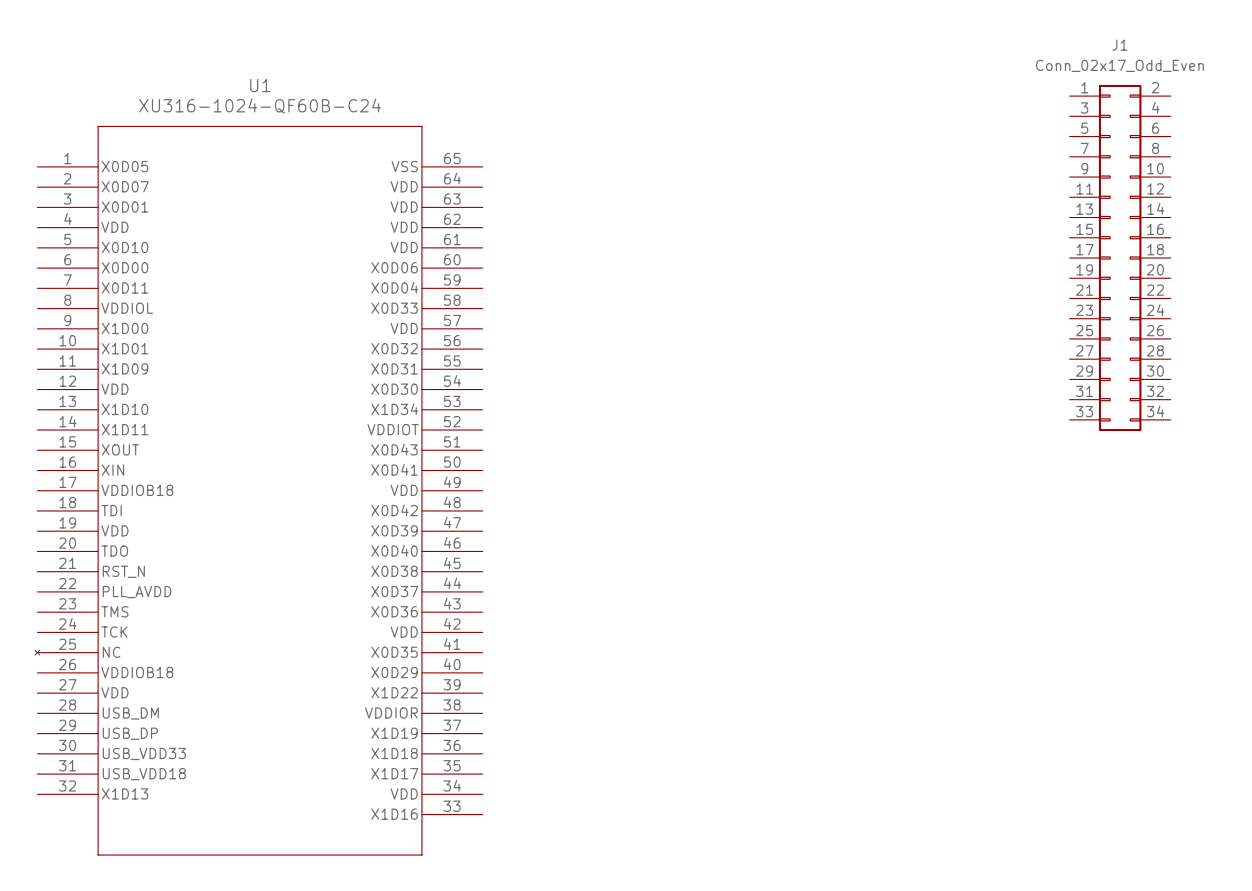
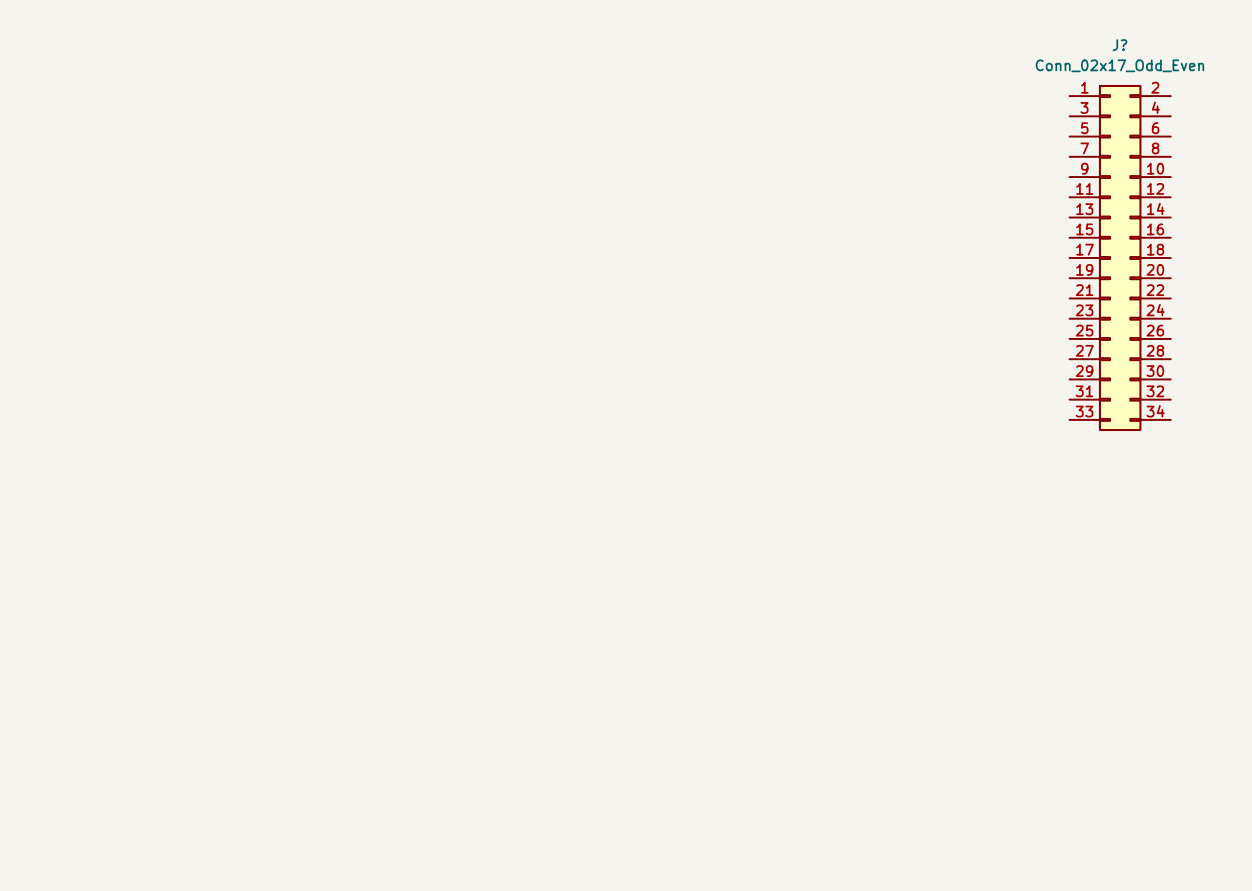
J1 name: J1 (1119, 45) -> J? (1119, 45)
U1: XU316-1024-QF60B-C24 (258, 490) -> none

